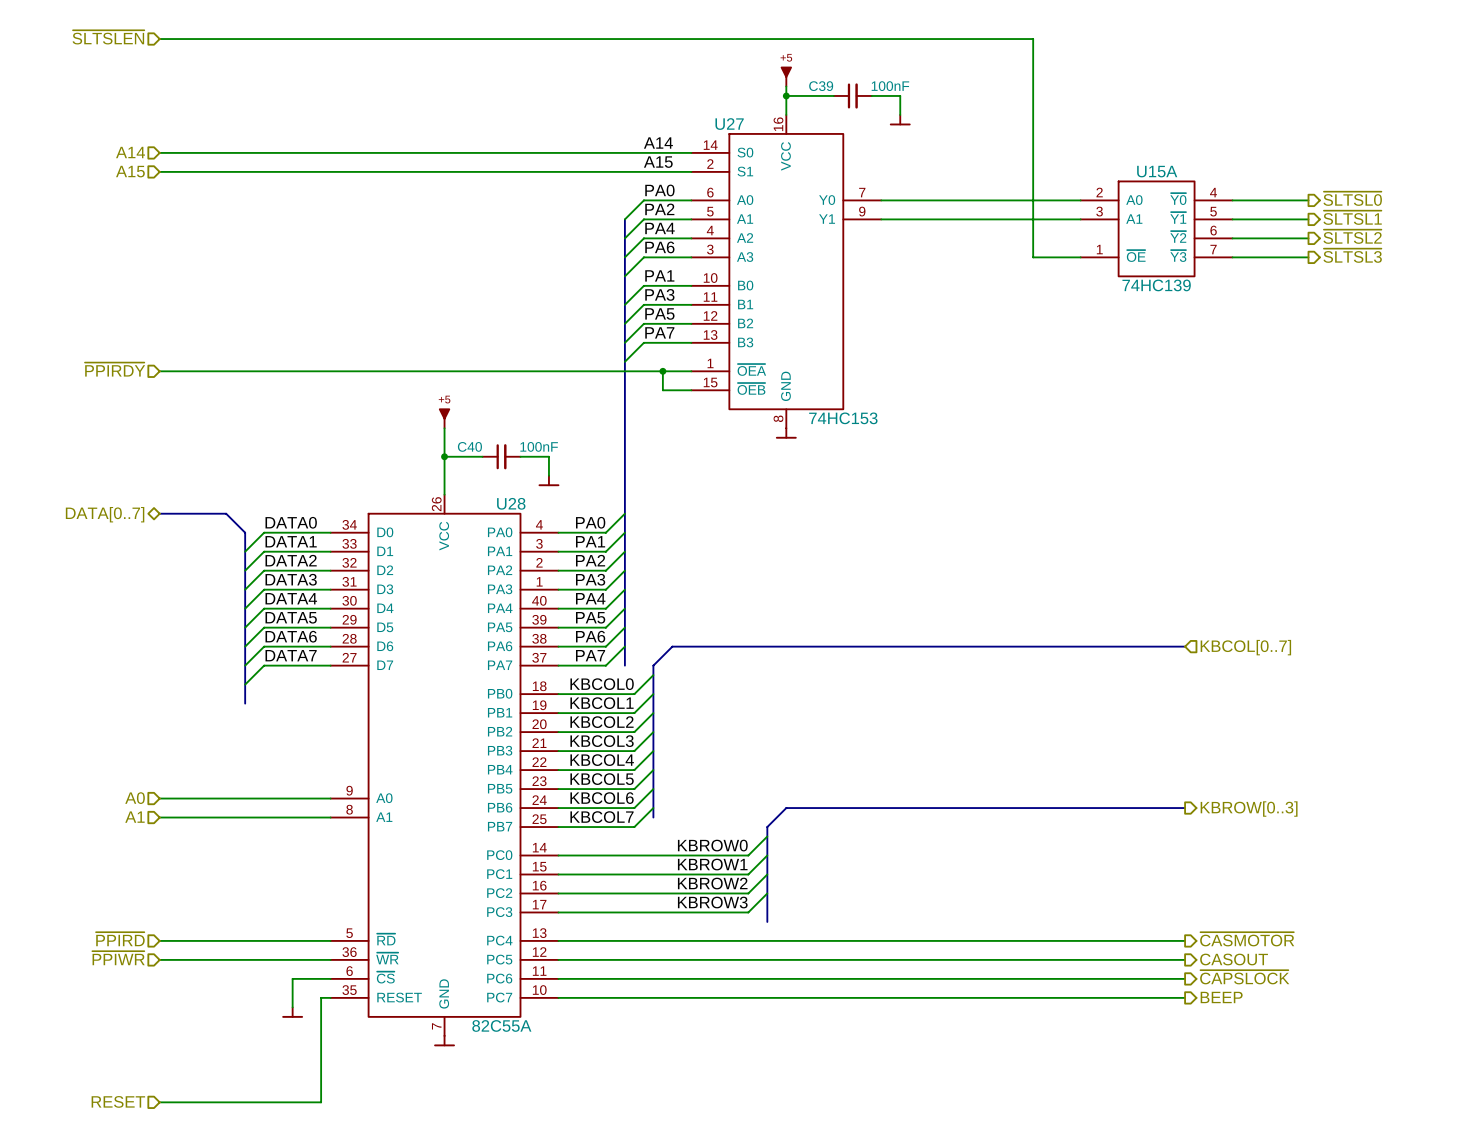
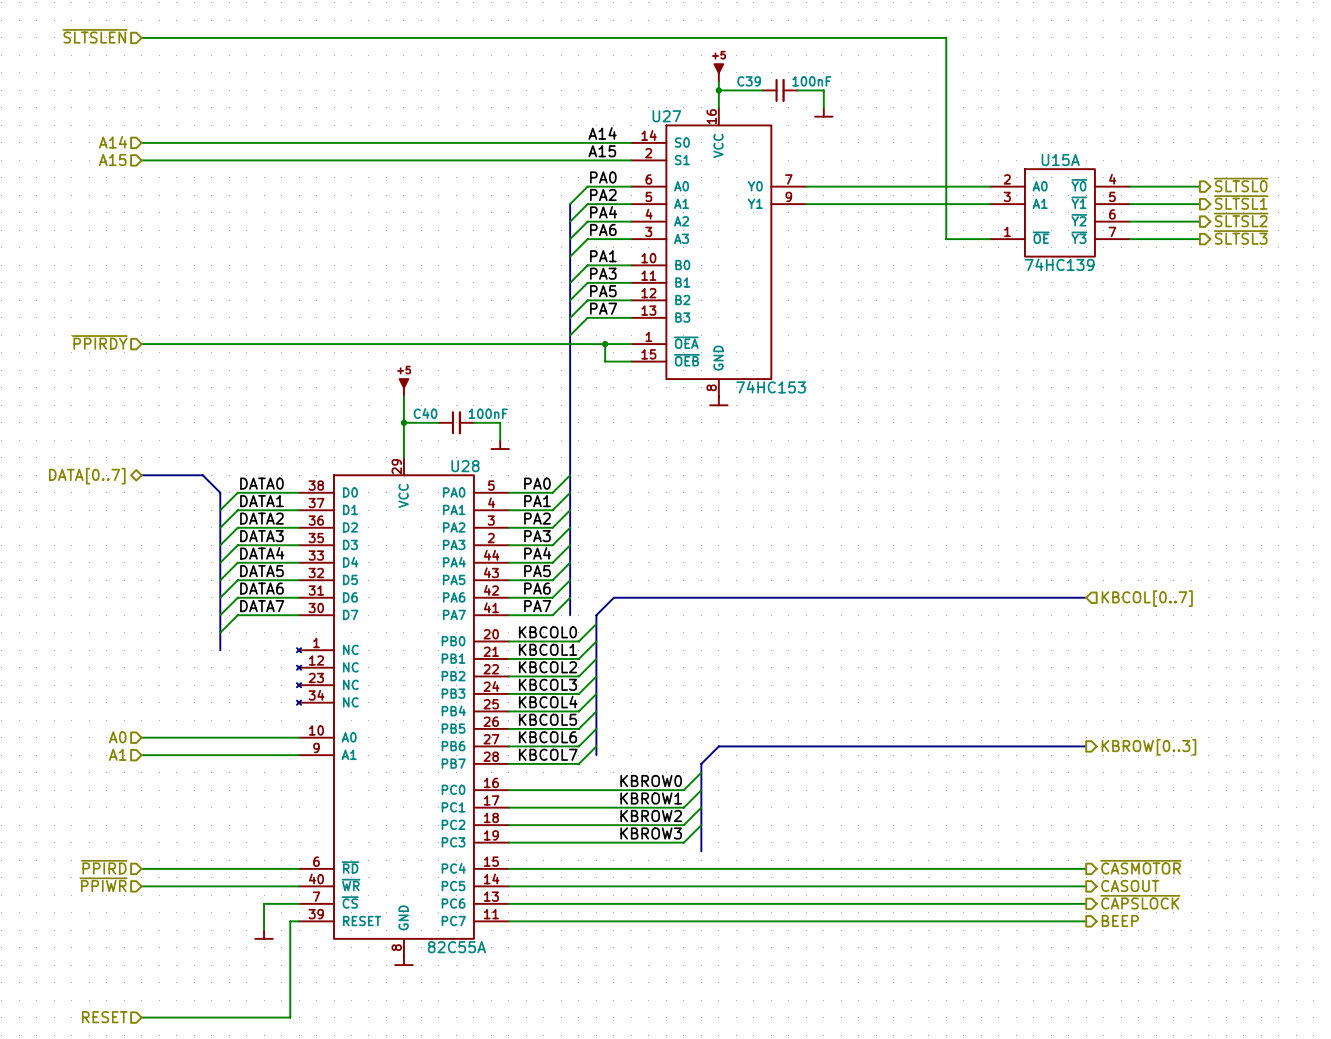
U28 symbol: [330, 494, 559, 1036] -> [296, 457, 509, 957]

